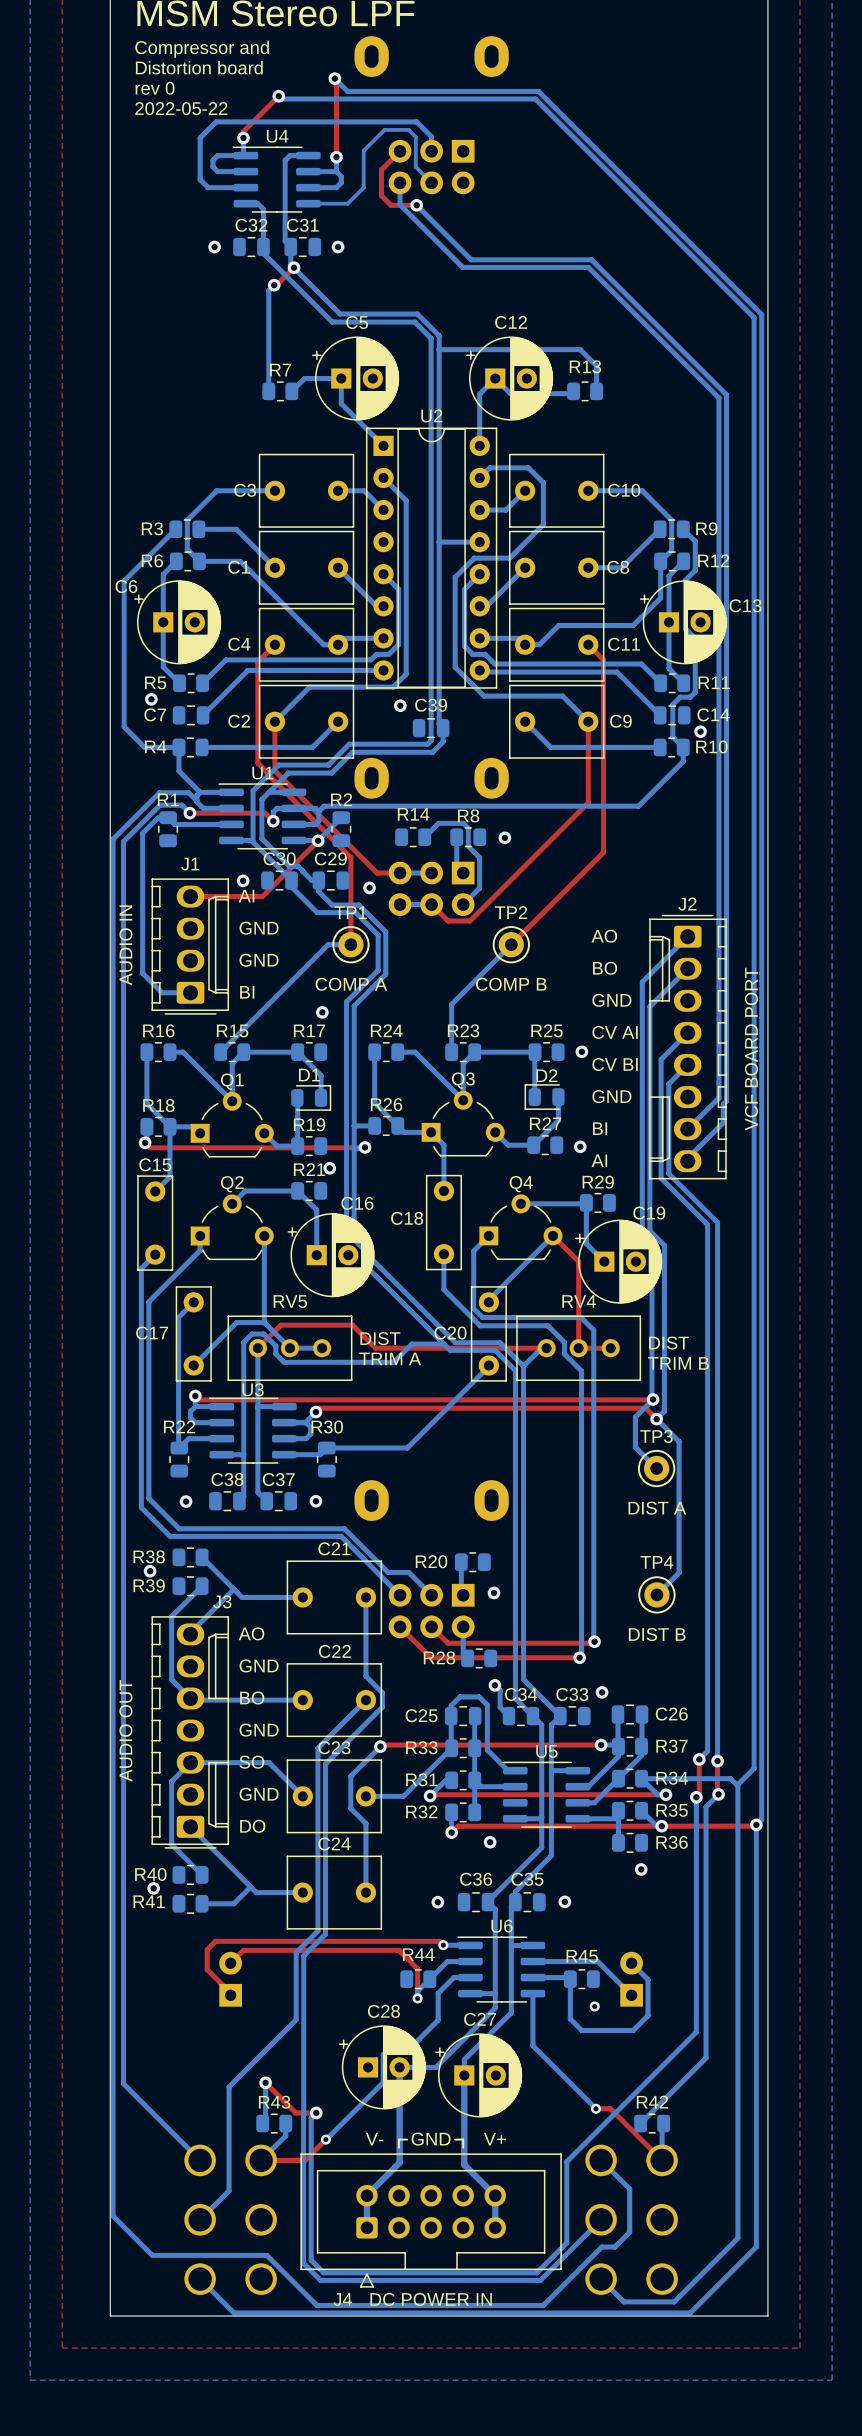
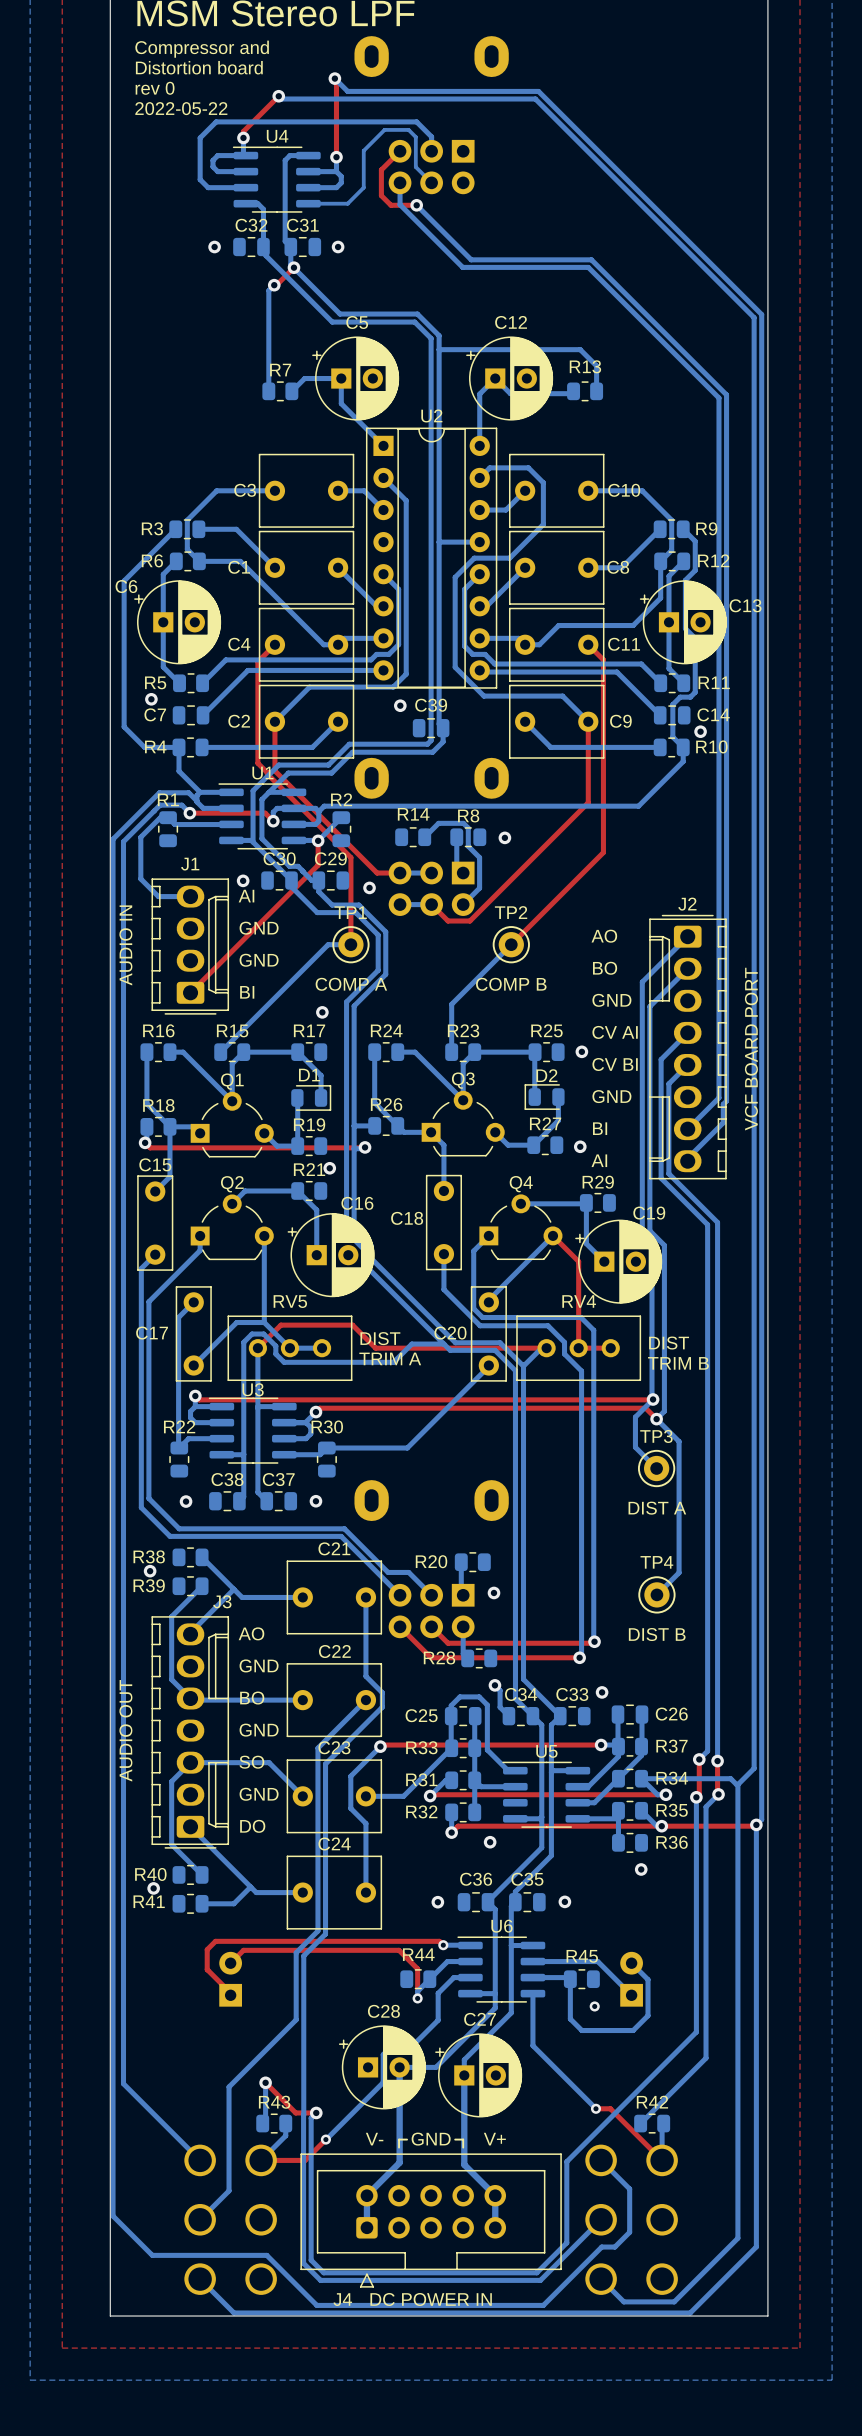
bottom track: (168, 817) (157, 817) (142, 833) (142, 973) (162, 992) (190, 992) -> (168, 817) (160, 817) (140, 837) (140, 878) (158, 896) (190, 896)
top track: (318, 840) (262, 896) (190, 896) -> (318, 840) (318, 865) (190, 992)

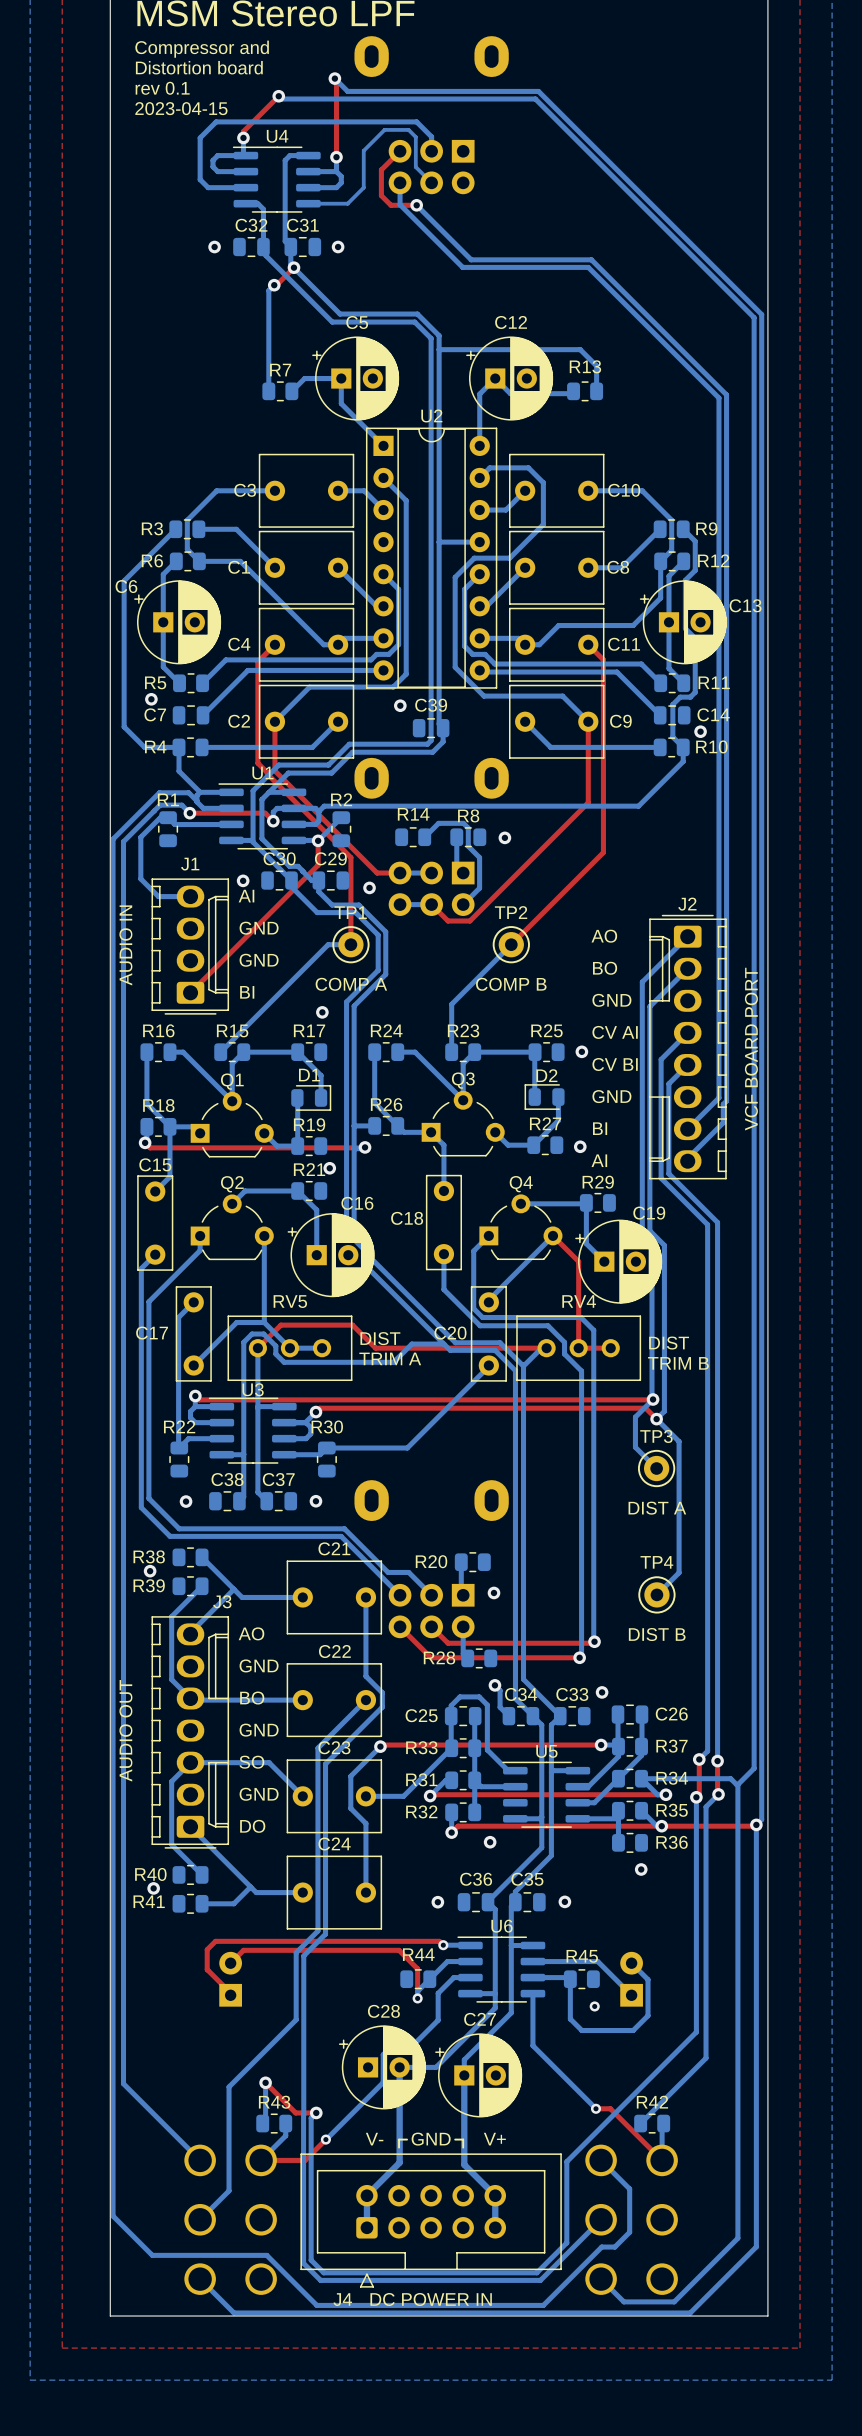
text: rev 0 (155, 88) -> rev 0.1 (162, 88)
text: 2022-05-22 (181, 108) -> 2023-04-15 (181, 108)

